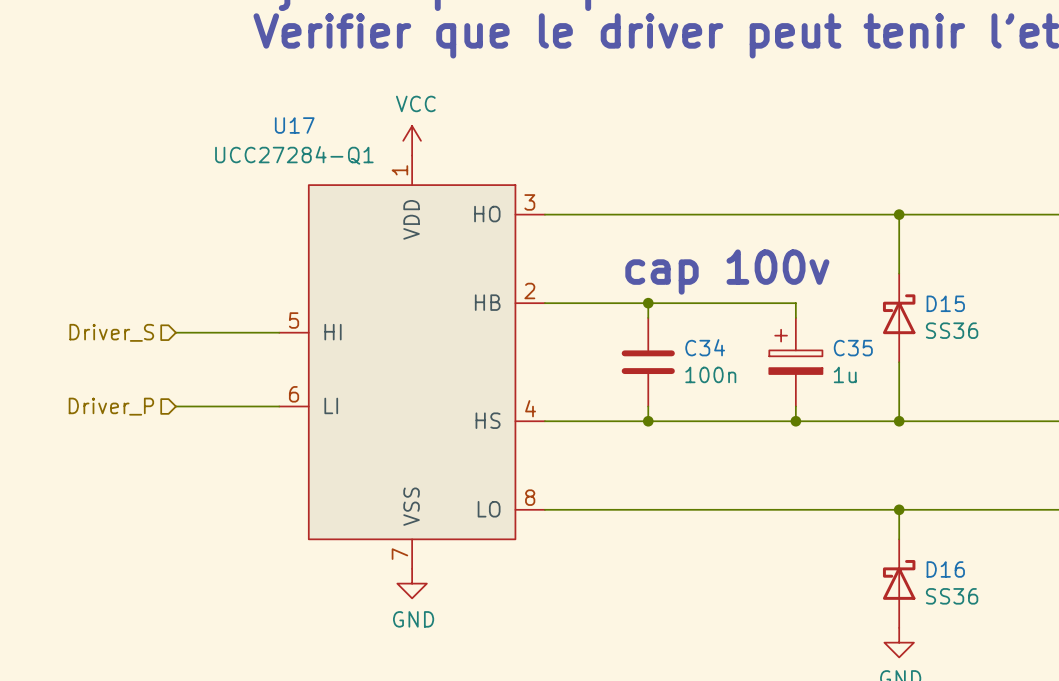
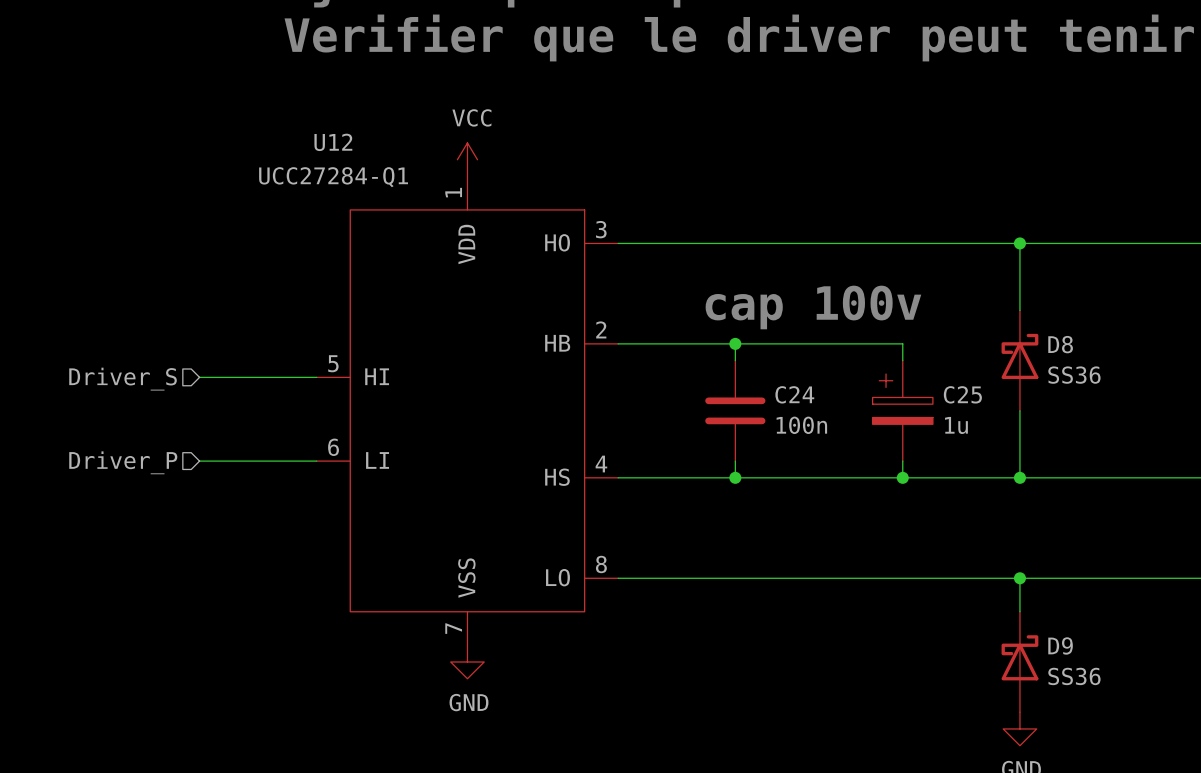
U17 name: U17 (294, 125) -> U12 (333, 142)
D15 name: D15 (945, 303) -> D8 (1060, 344)
C34 name: C34 (705, 347) -> C24 (794, 394)
C35 name: C35 (853, 348) -> C25 (962, 394)
D16 name: D16 (945, 569) -> D9 (1060, 645)

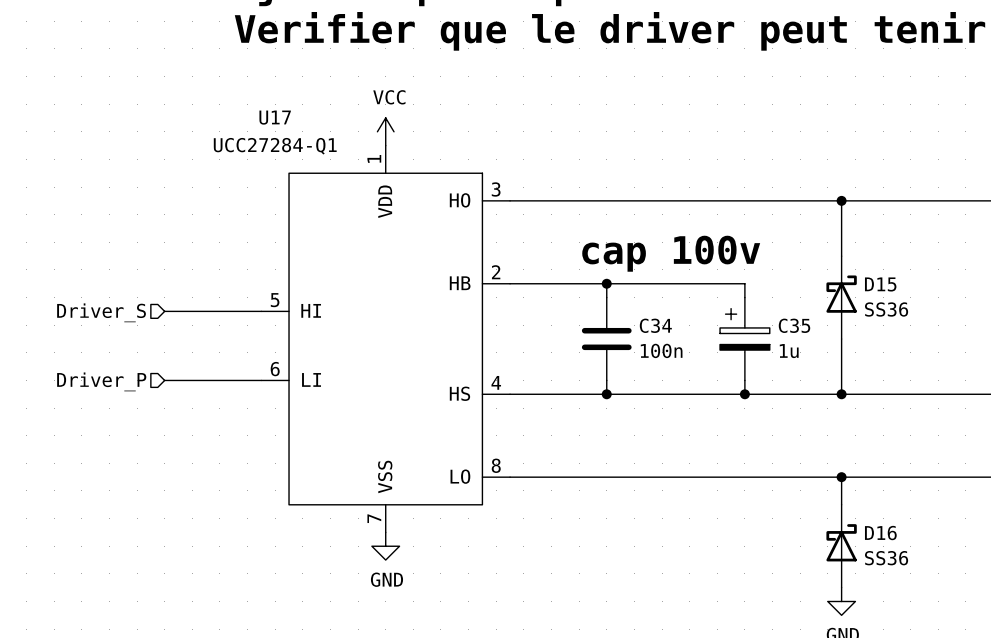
U12 name: U12 (333, 142) -> U17 (275, 117)
D8 name: D8 (1060, 344) -> D15 (880, 284)
C24 name: C24 (794, 394) -> C34 (655, 325)
C25 name: C25 (962, 394) -> C35 (794, 325)
D9 name: D9 (1060, 645) -> D16 (880, 533)

